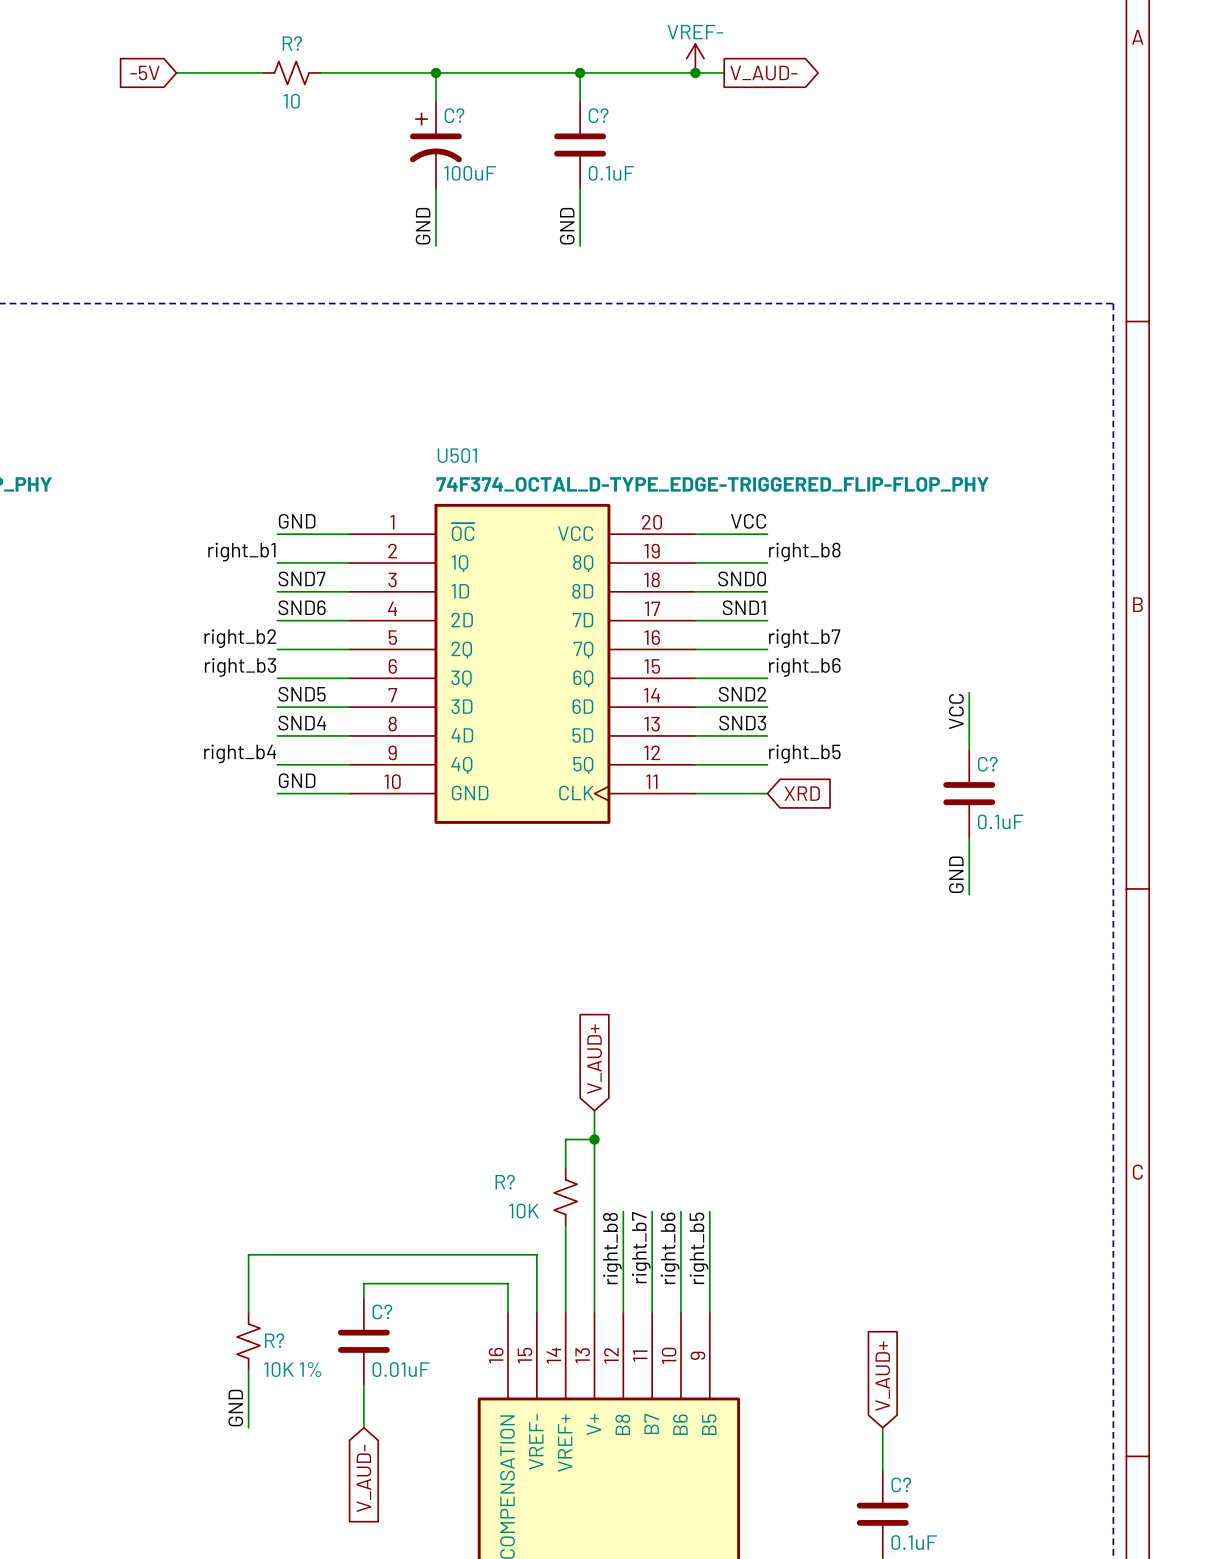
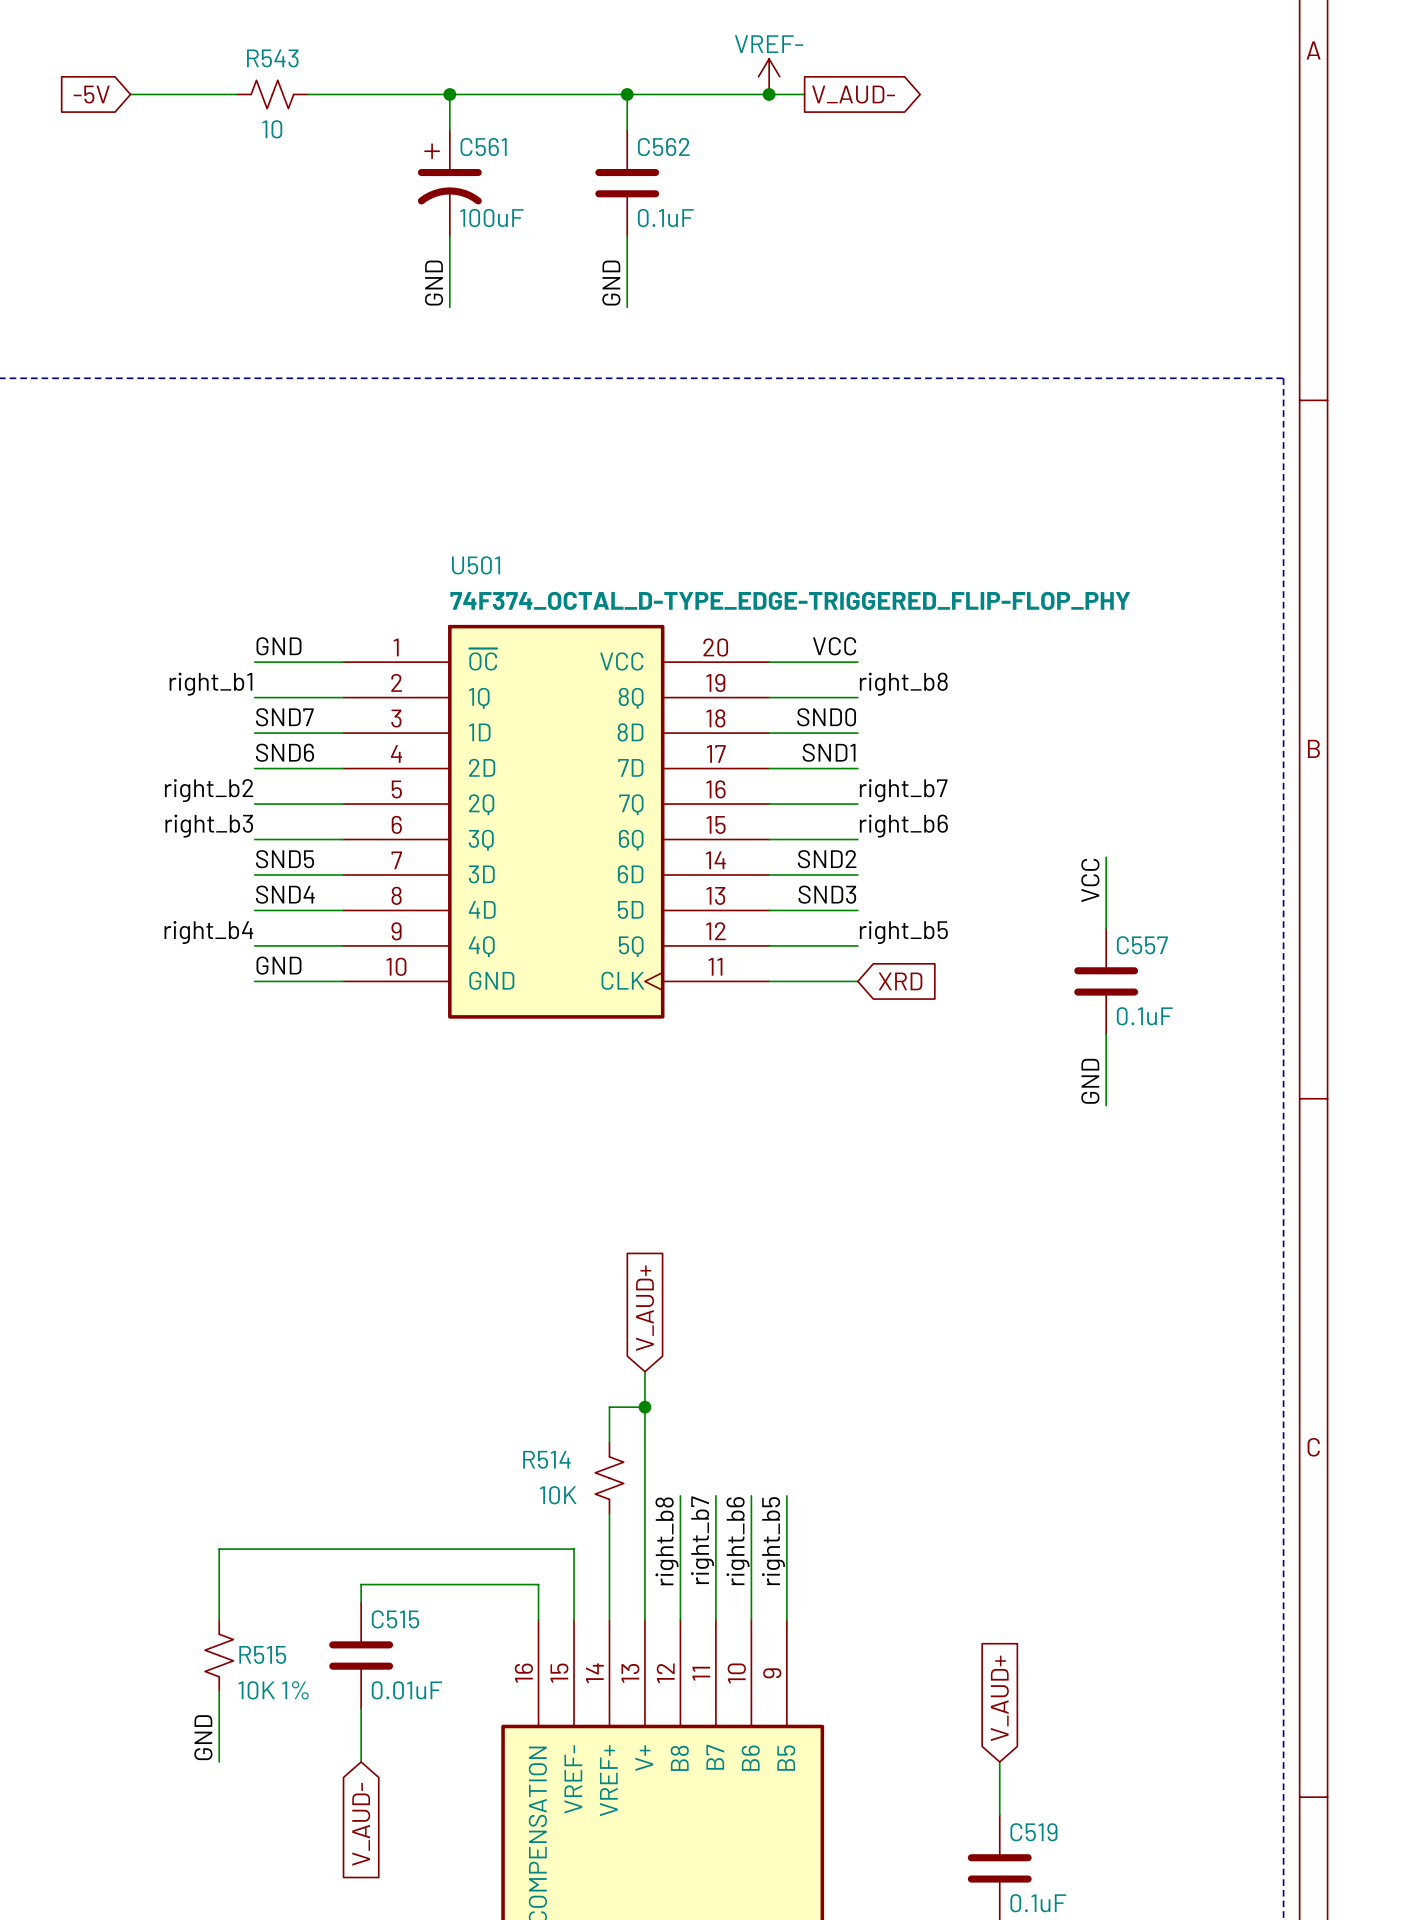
R? name: R? (292, 43) -> R543 (272, 58)
C? name: C? (454, 115) -> C561 (483, 147)
C? name: C? (598, 115) -> C562 (663, 147)
C? name: C? (987, 764) -> C557 (1142, 945)
R? name: R? (505, 1182) -> R514 (546, 1459)
C? name: C? (382, 1311) -> C515 (395, 1619)
R? name: R? (274, 1340) -> R515 (262, 1654)
C? name: C? (901, 1484) -> C519 (1033, 1832)

